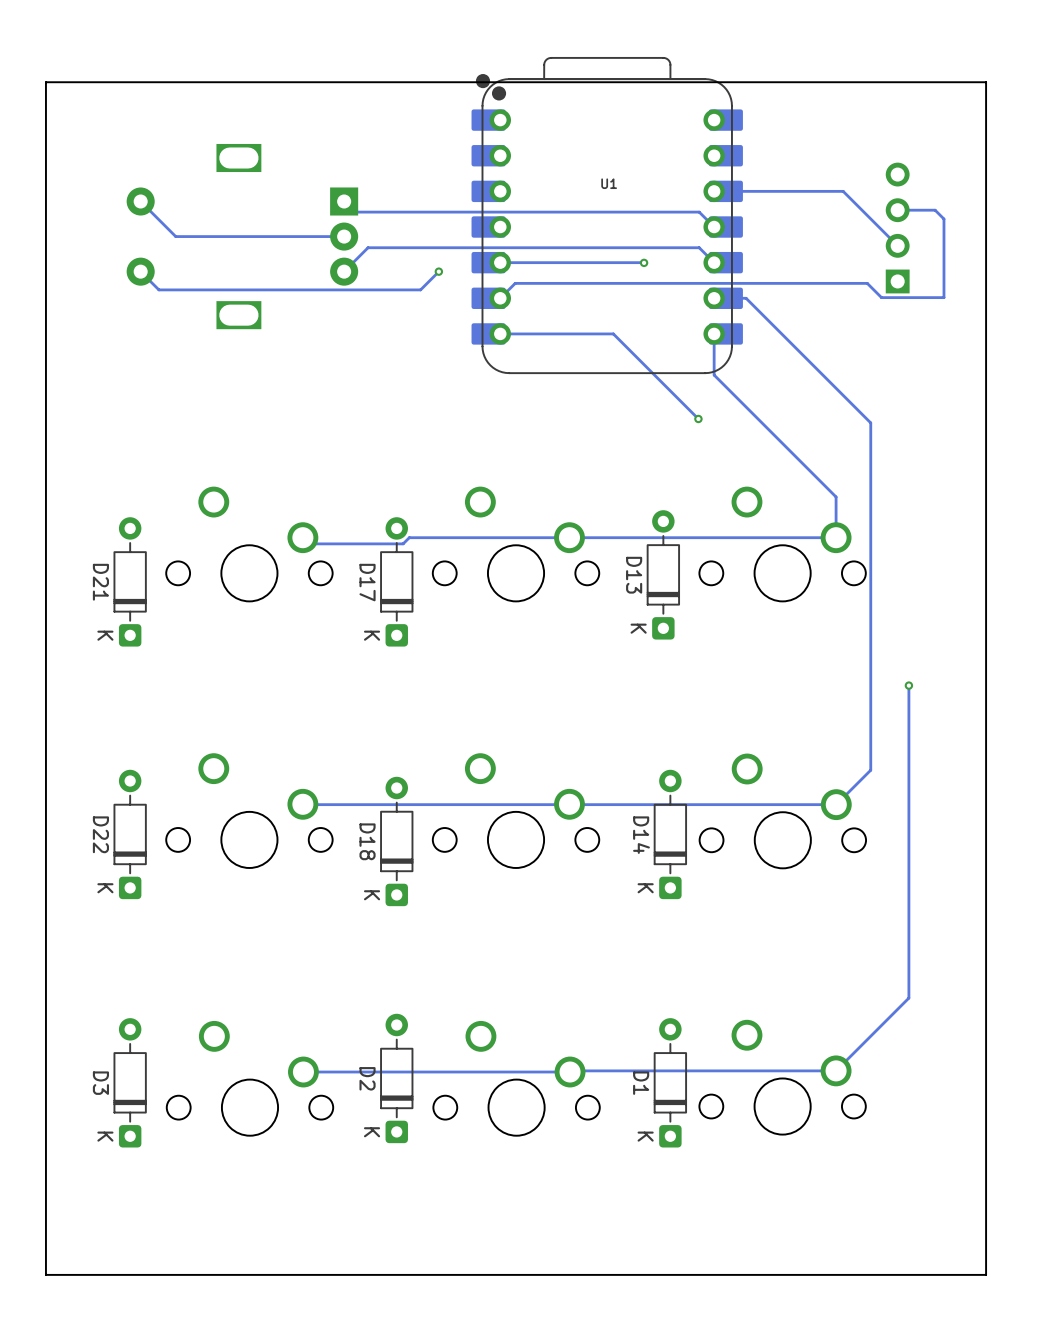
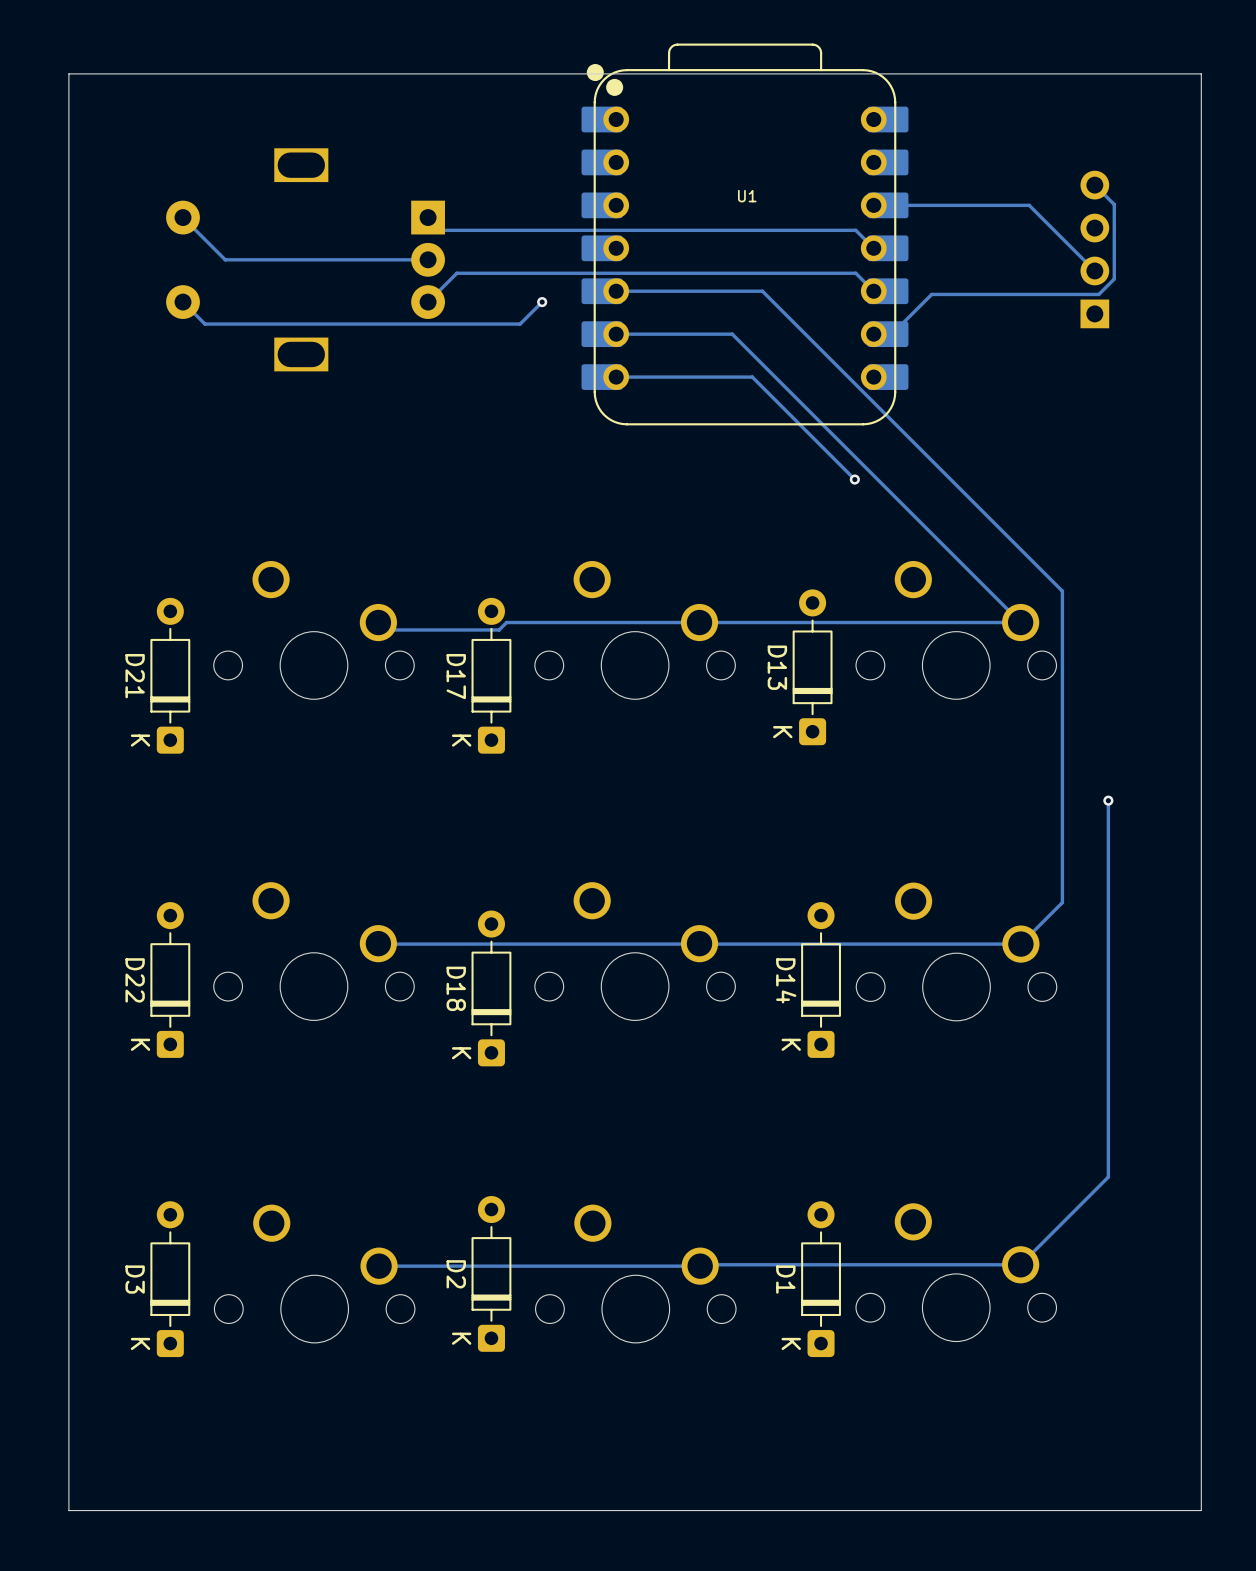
track: none -> (1094, 185) (1114, 204) (1114, 279) (1098, 294) (931, 294) (891, 334)
track: (897, 210) (935, 210) (943, 219) (943, 297) (881, 297) (867, 283) (515, 283) (500, 298) -> none
track: (621, 262) (644, 262) -> none
via: (644, 262) -> none
track: (729, 298) (746, 298) (870, 422) (870, 511) -> (762, 291) (1062, 591)
track: (714, 333) (714, 375) (836, 497) (836, 537) -> (616, 334) (732, 334) (1020, 622)

